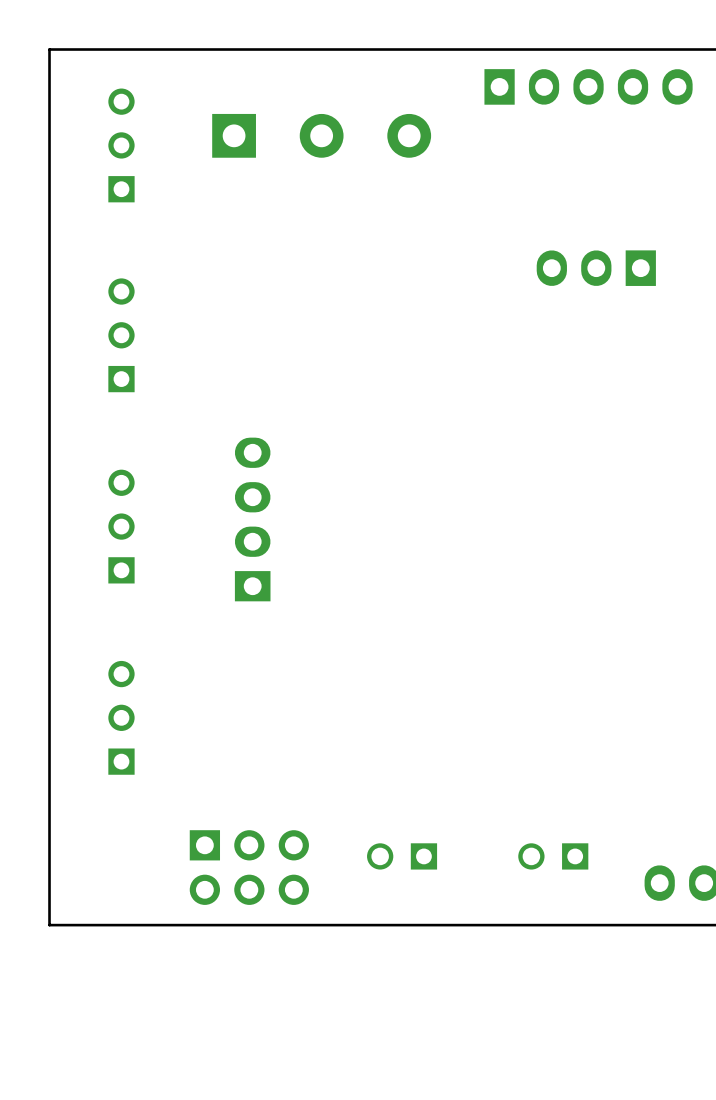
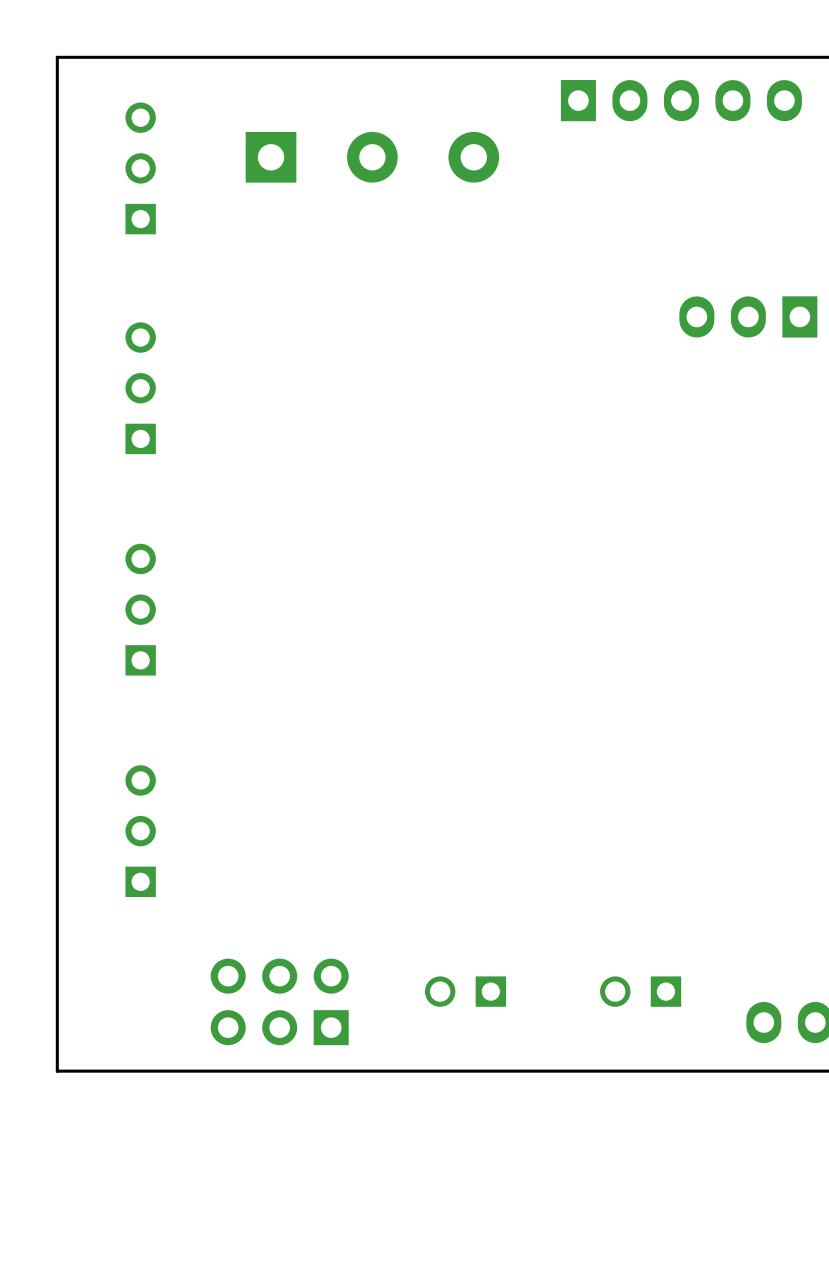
part position: (596, 268) -> (748, 316)
part: (252, 519) -> none
part rotation: 0° (249, 867) -> 180° (279, 1001)

